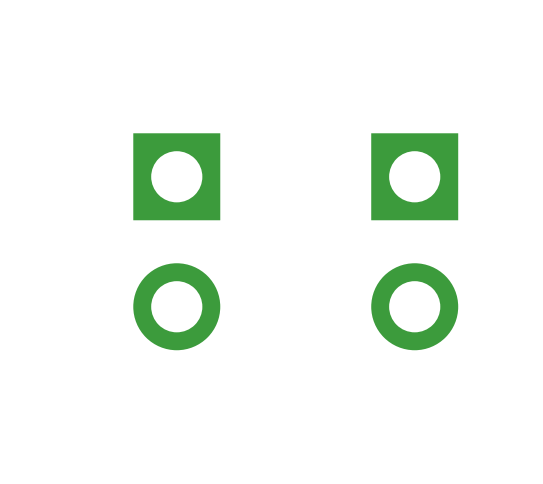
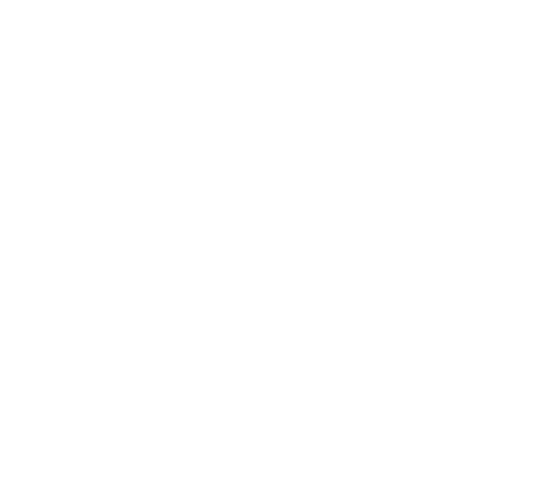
part: (176, 241) -> none
part: (414, 241) -> none

